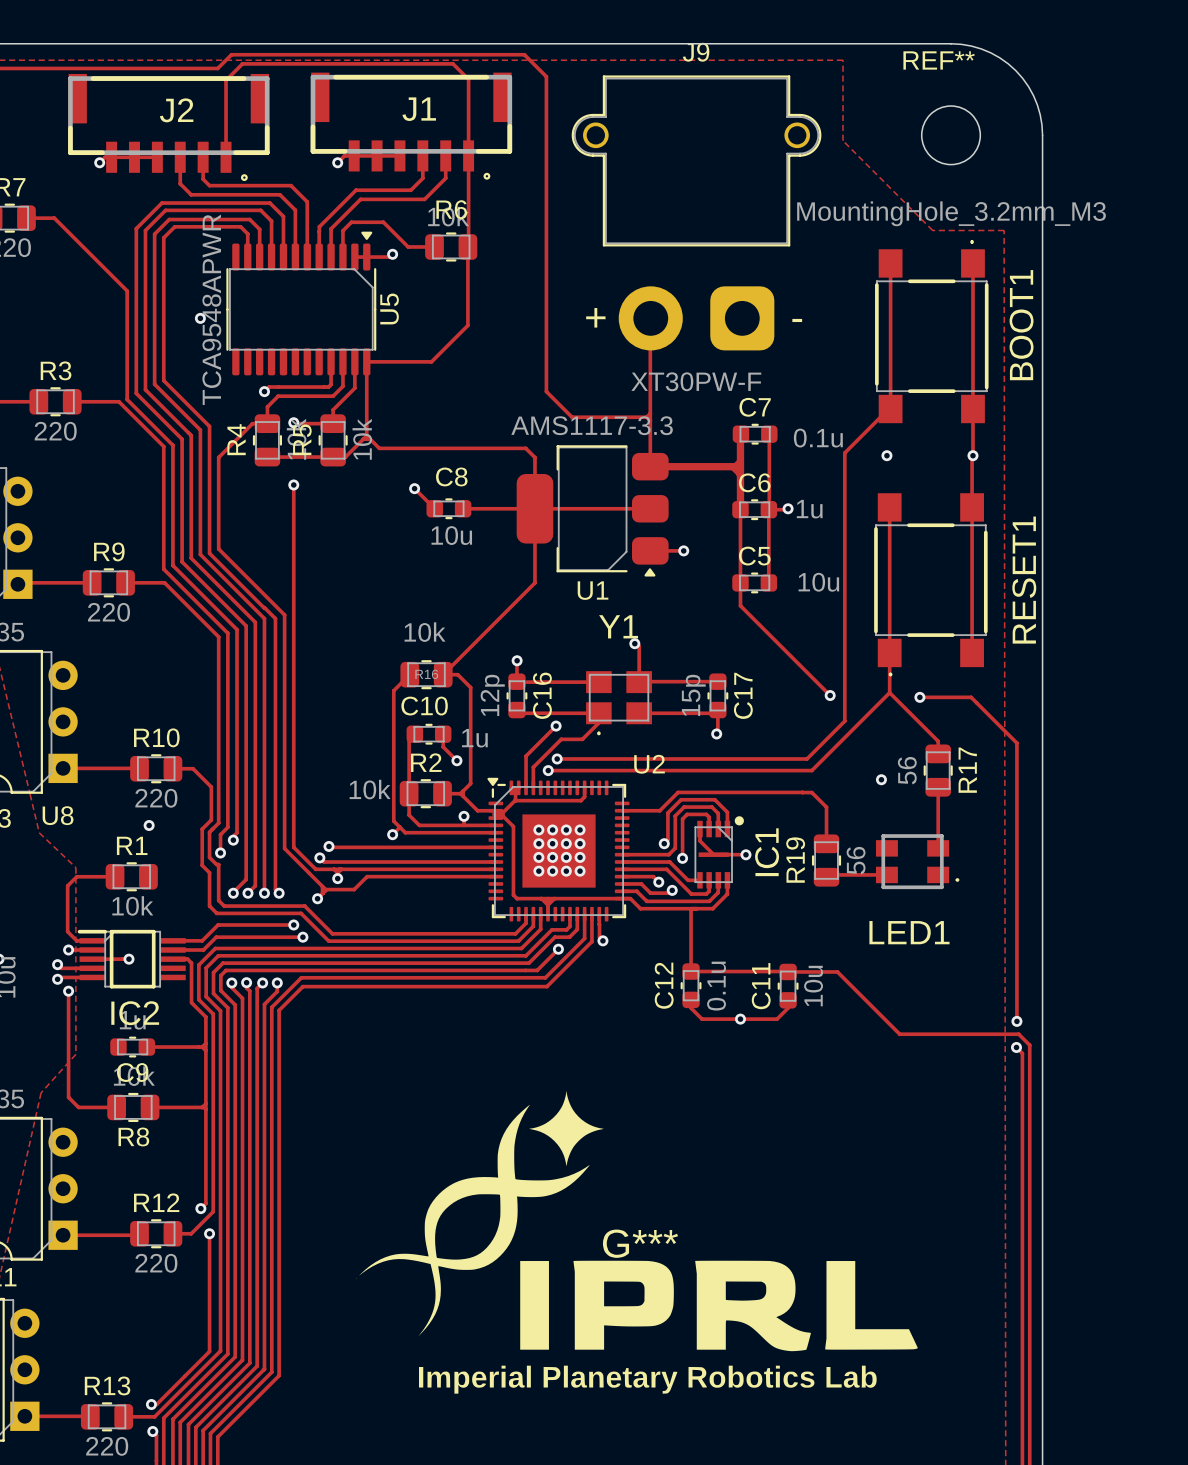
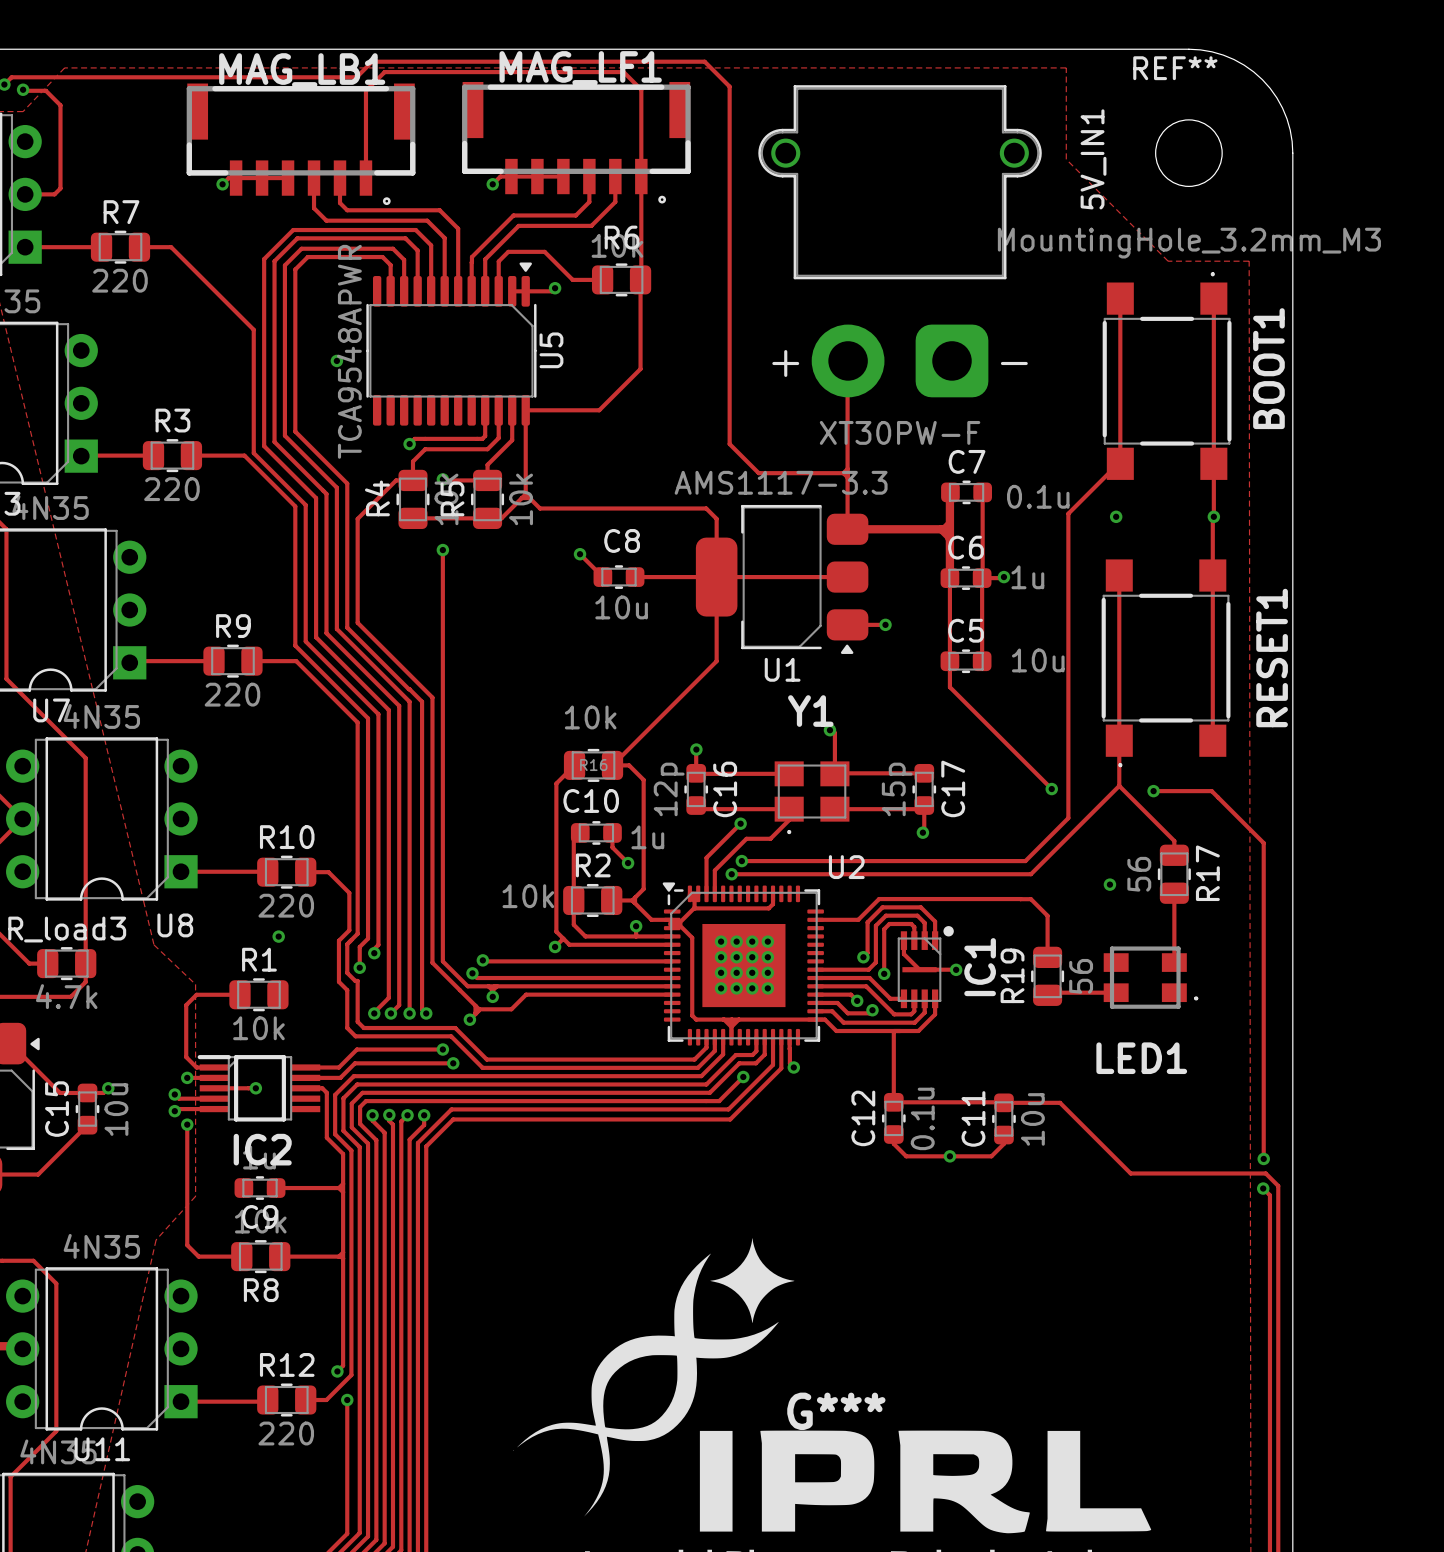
J9 name: J9 (696, 52) -> 5V_IN1 (1093, 159)
J1 name: J1 (419, 109) -> MAG_LF1 (580, 68)
J2 name: J2 (176, 110) -> MAG_LB1 (302, 70)

